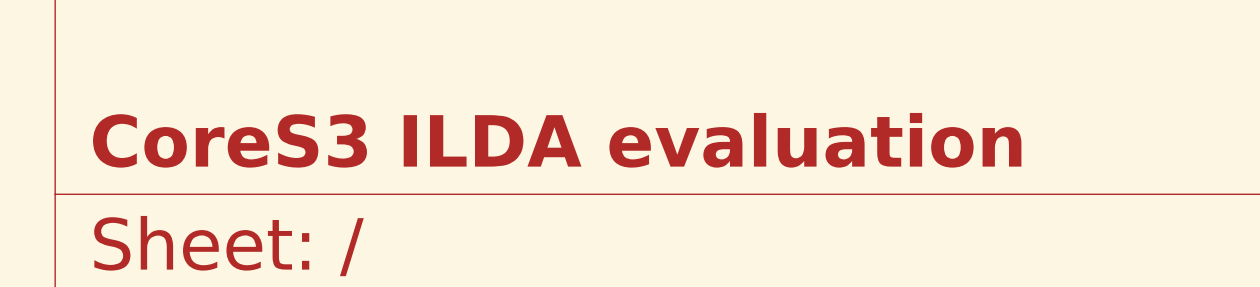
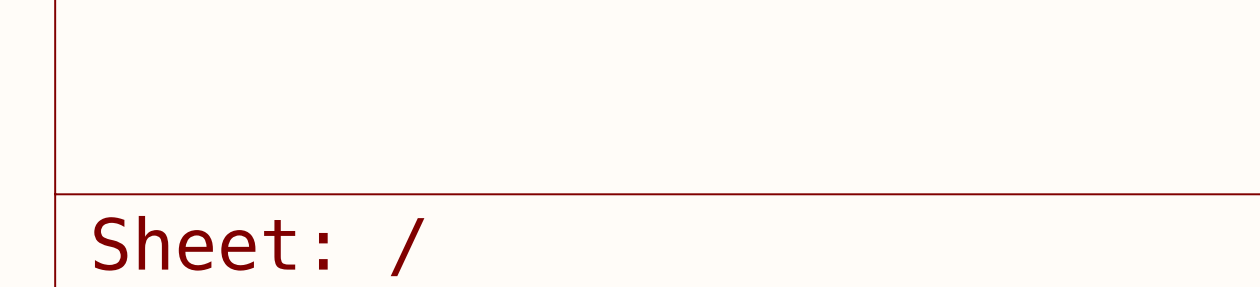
title block: CoreS3 ILDA evaluation (557, 140) -> none

